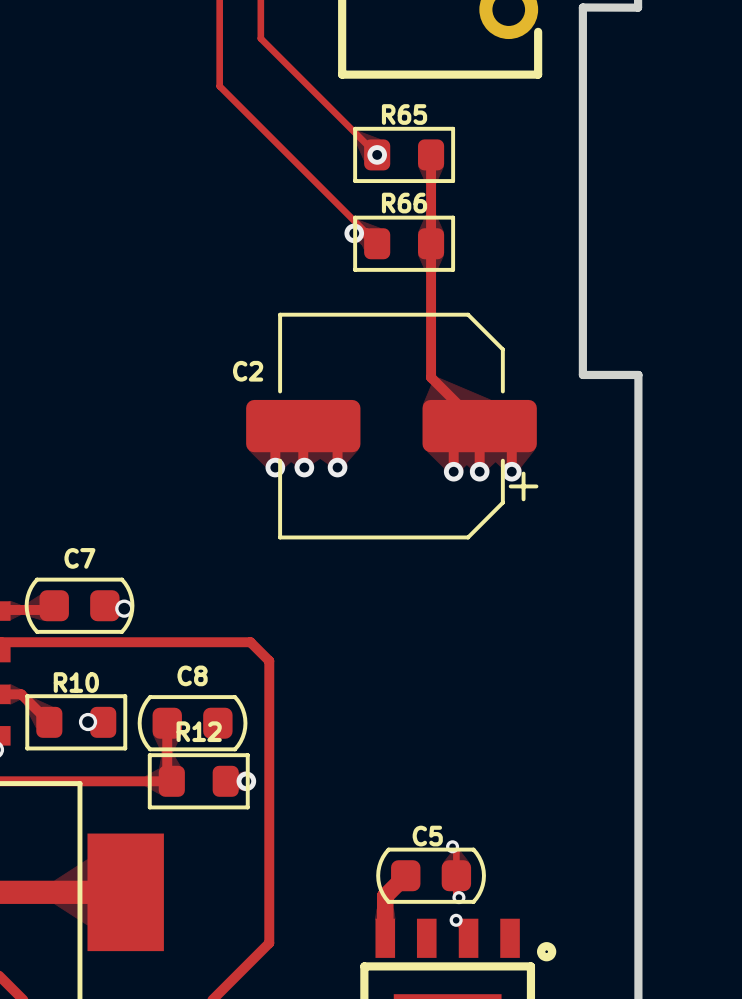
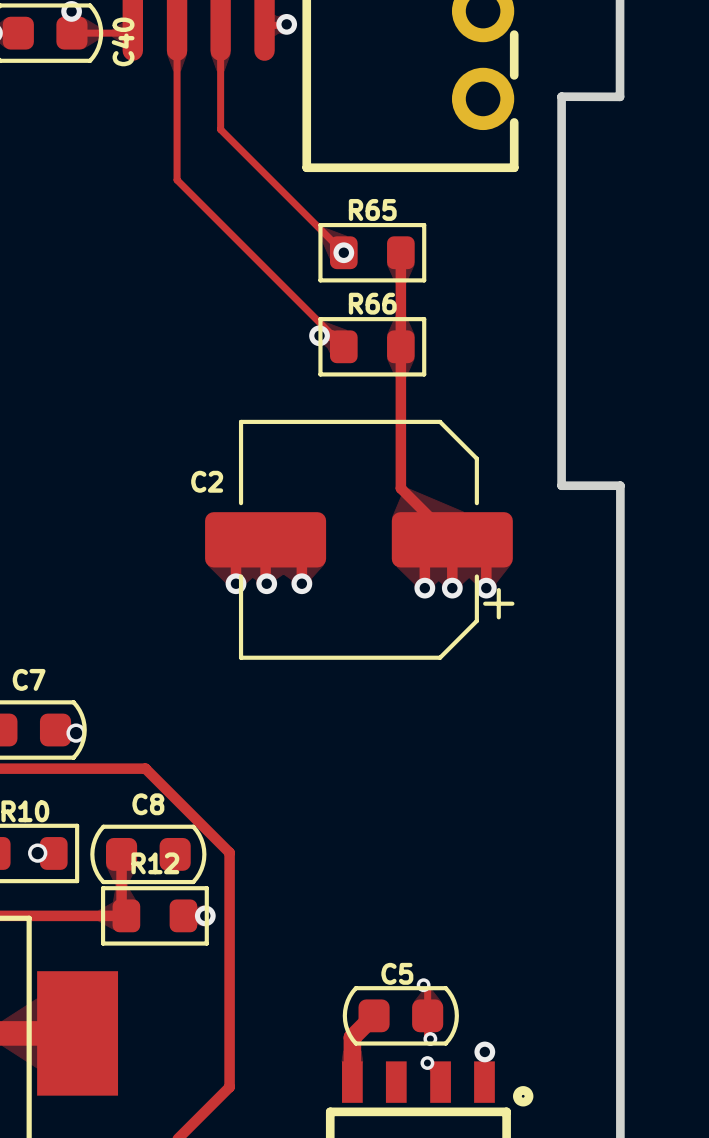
track: (189, 642) (250, 642) (269, 661) (269, 721) -> (145, 768) (229, 852)
via: none -> (484, 1051)

